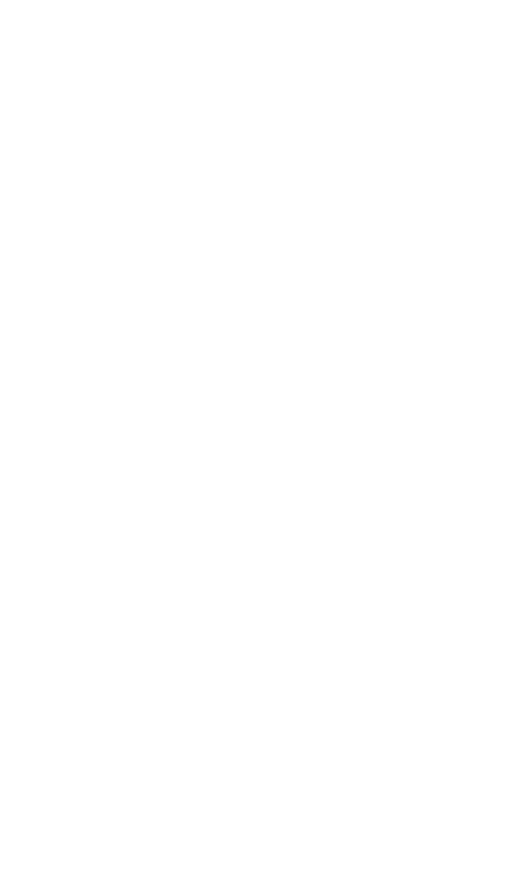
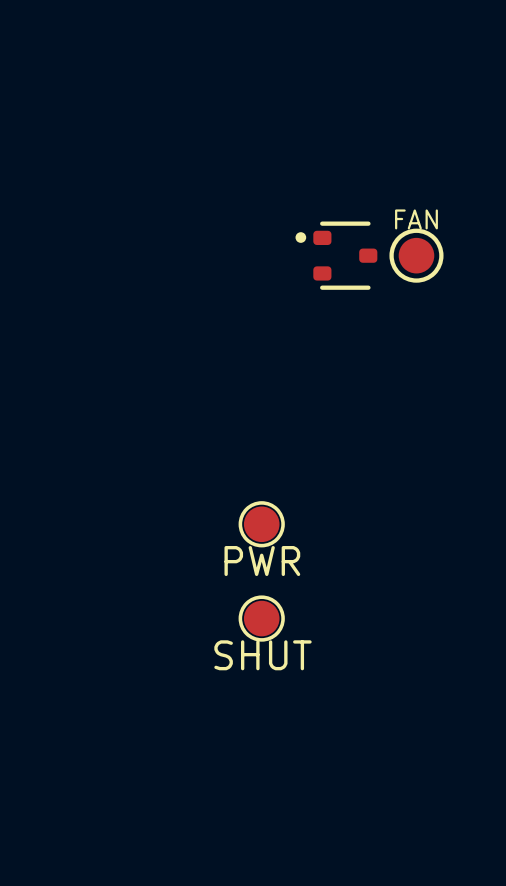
part: none -> (336, 255)
part: none -> FAN (416, 255)
part: none -> PWR (261, 524)
part: none -> SHUT (261, 618)

